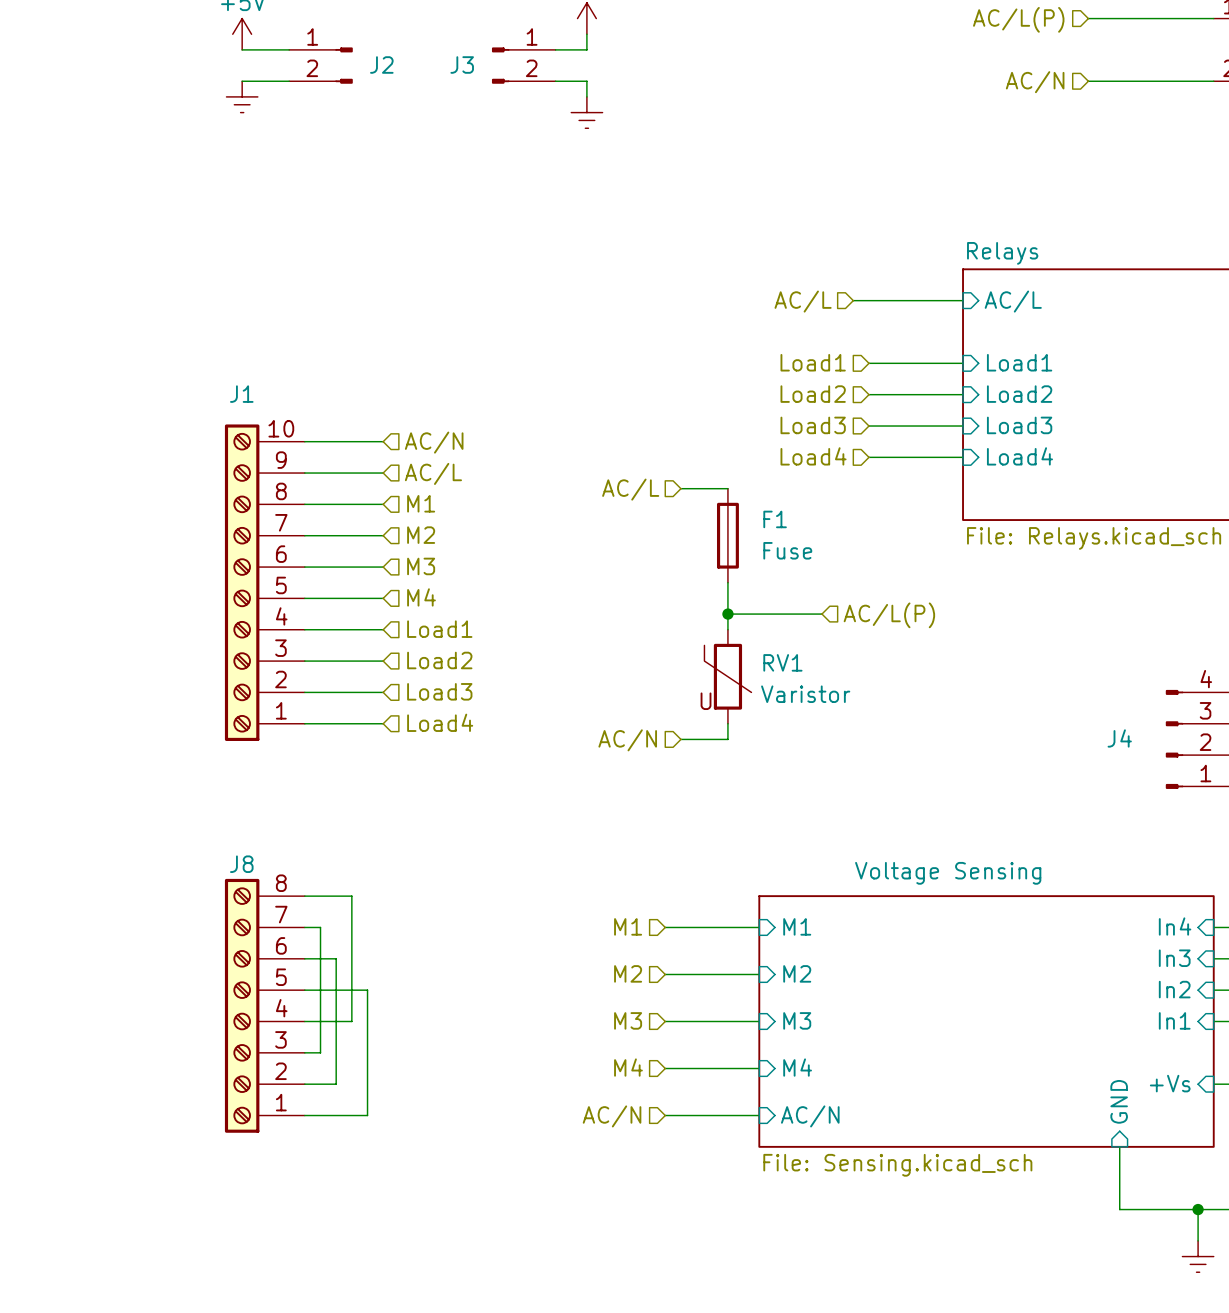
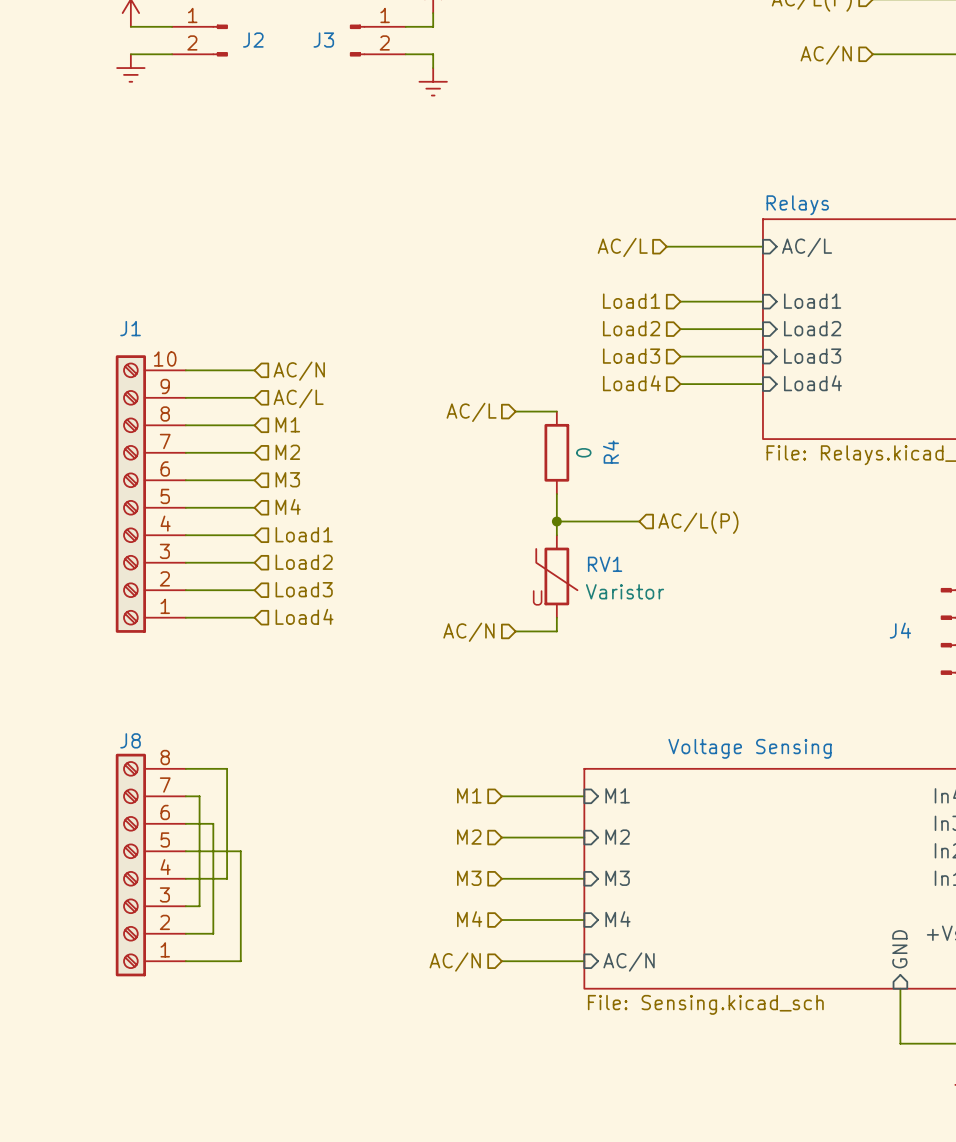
F1: Fuse (727, 535) -> none
R4: none -> 0 (556, 452)

